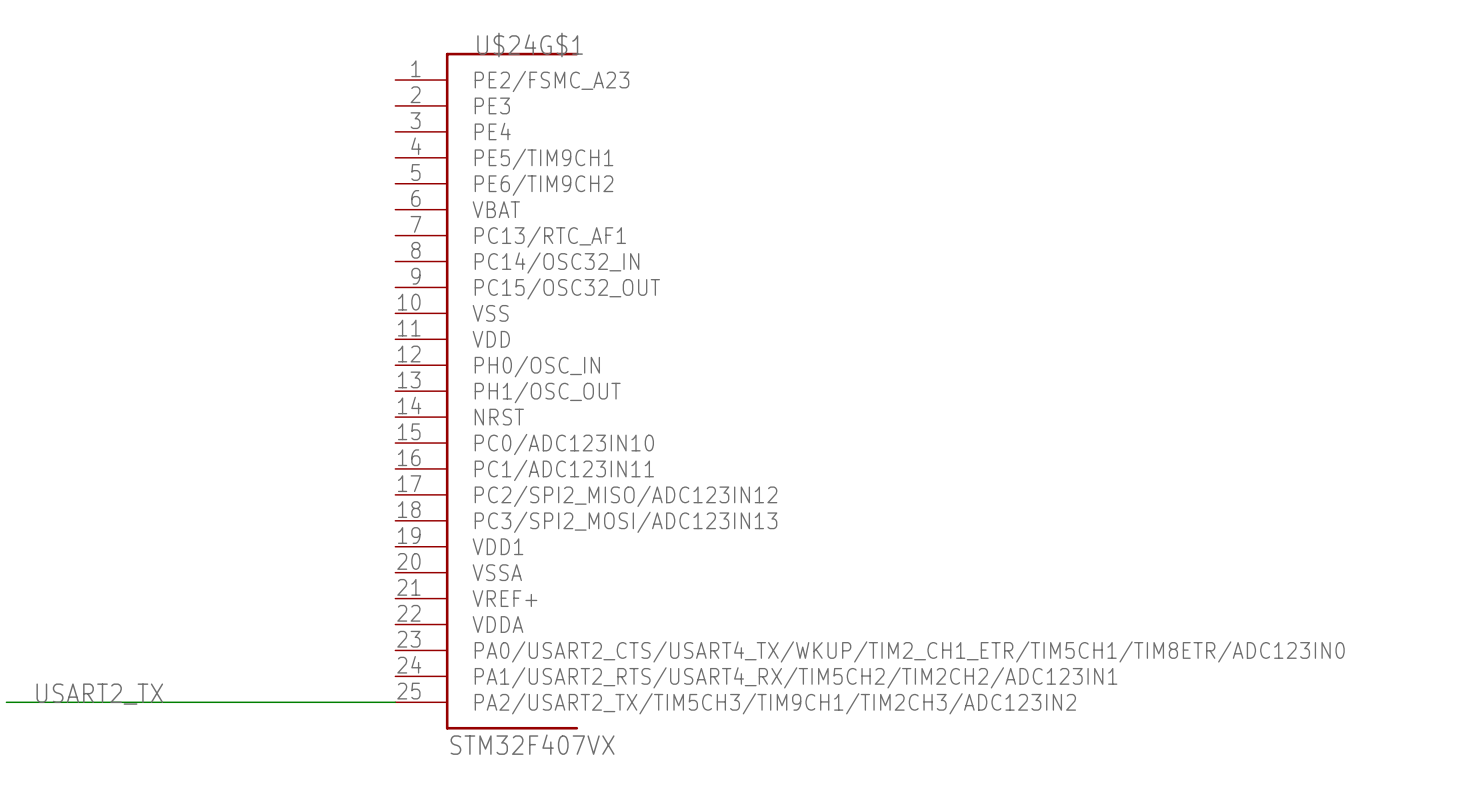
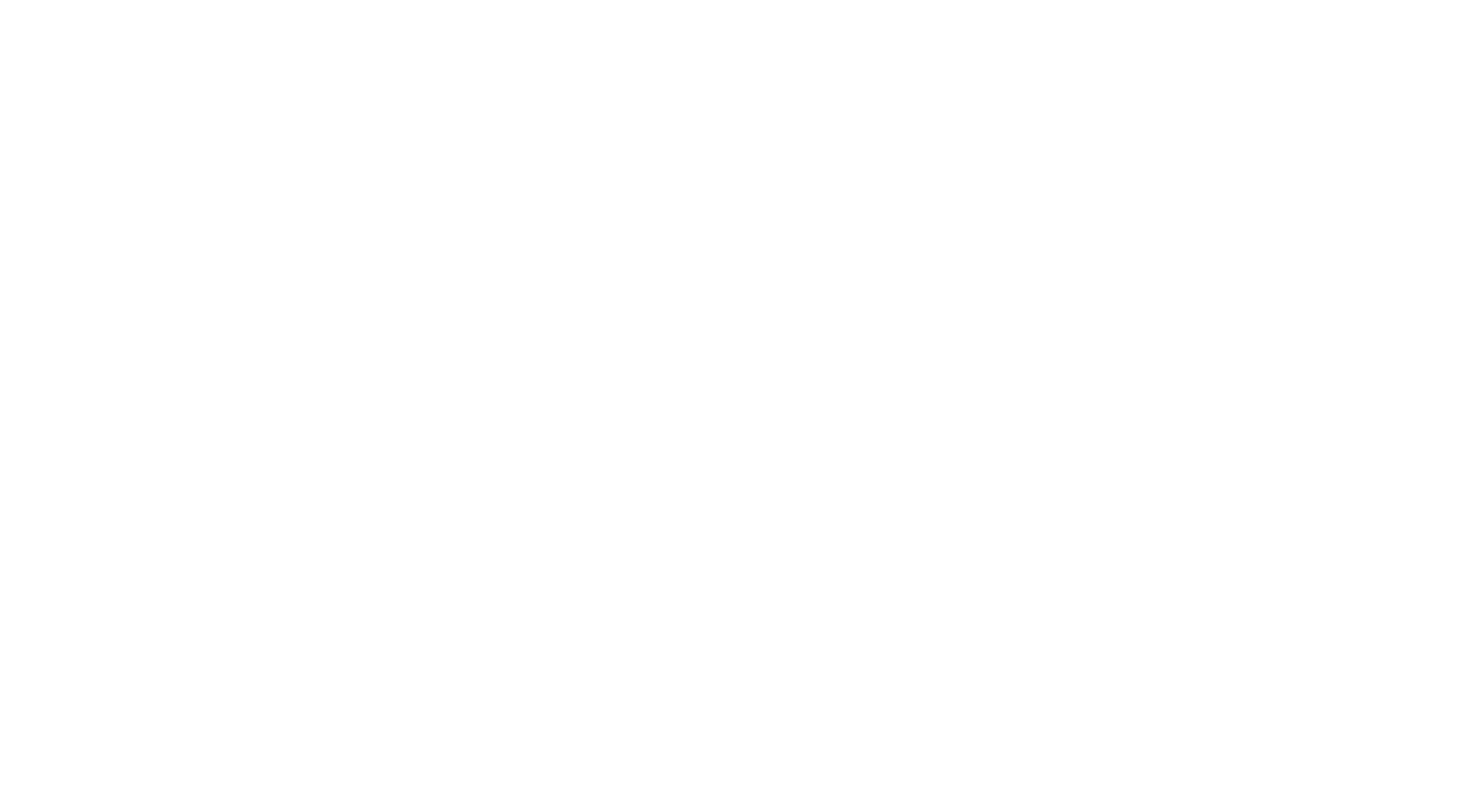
U$24G$1: STM32F407VX (486, 391) -> none
label: USART2_TX (99, 694) -> none
wire: (6, 702) (395, 702) -> none

